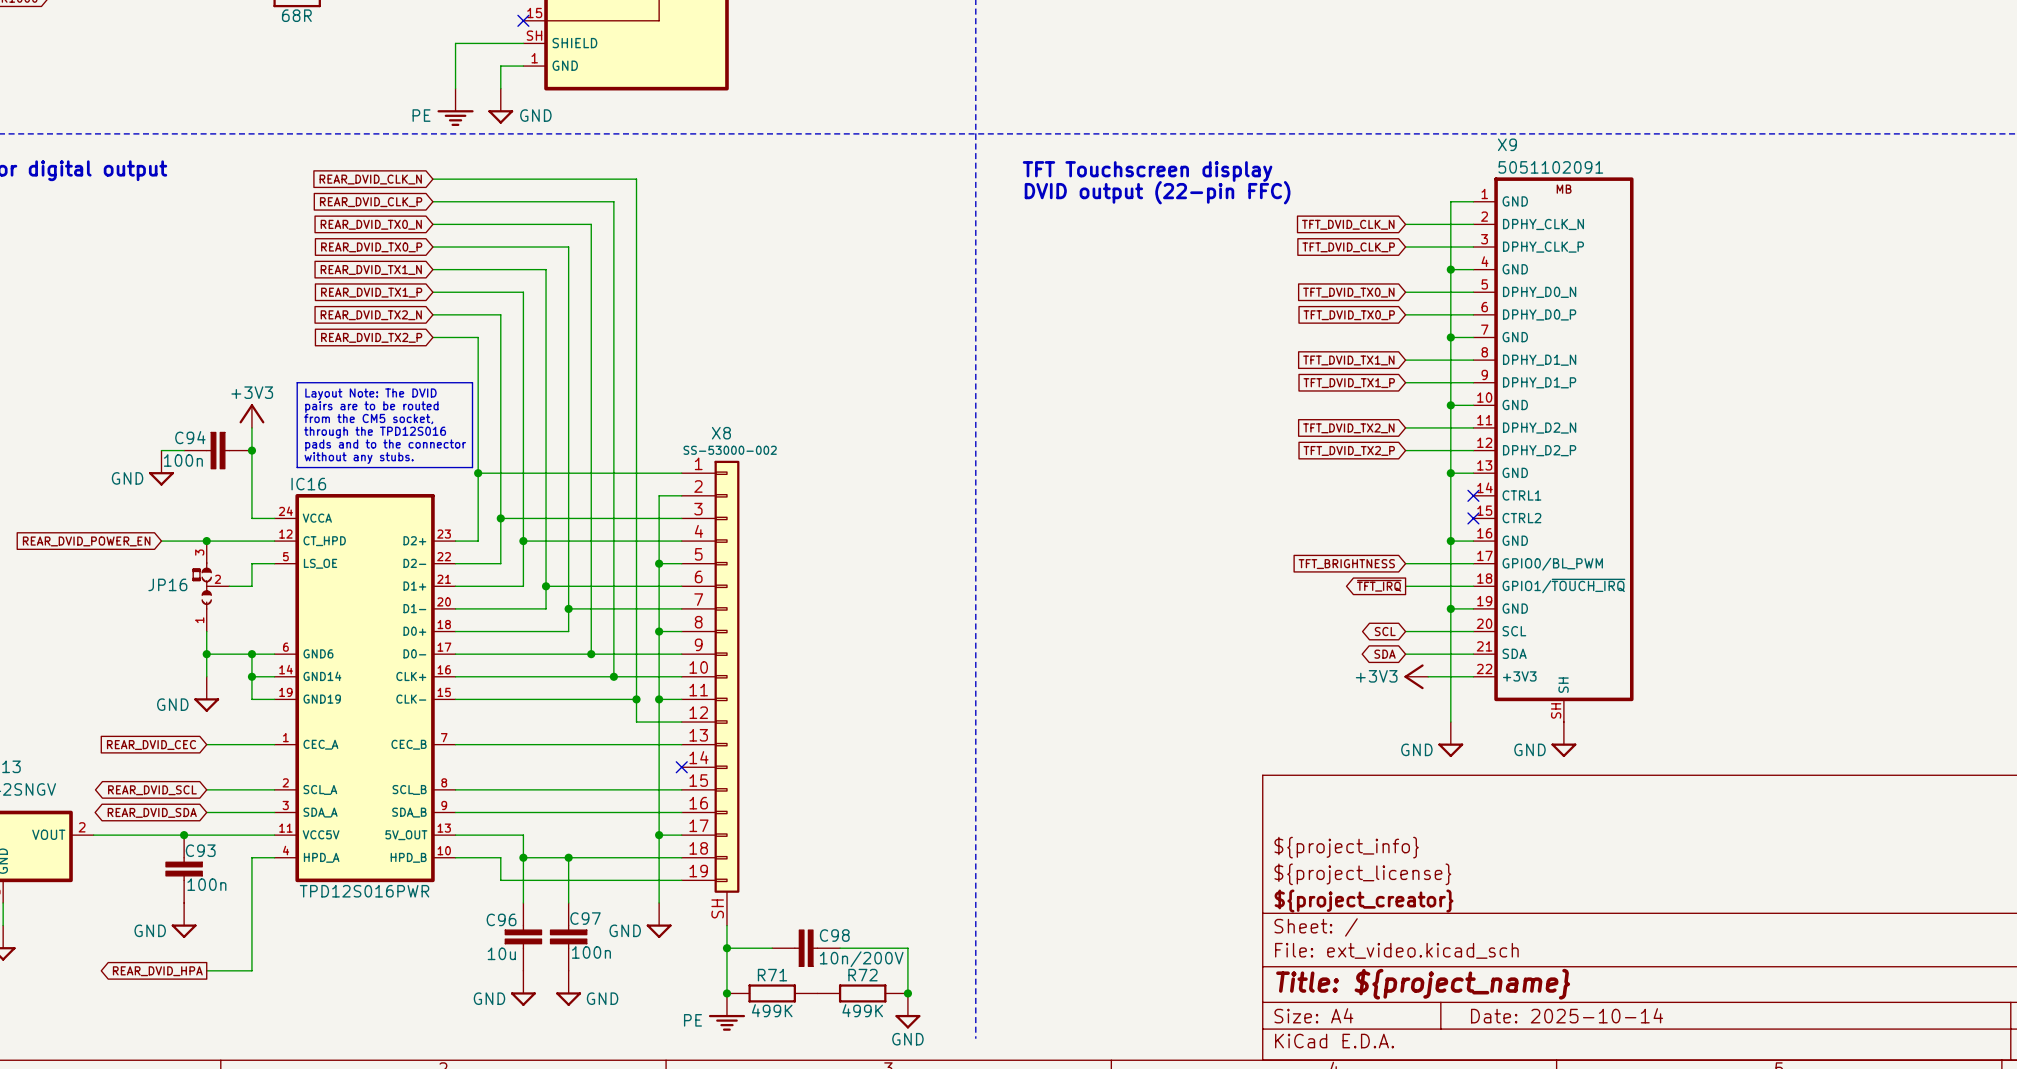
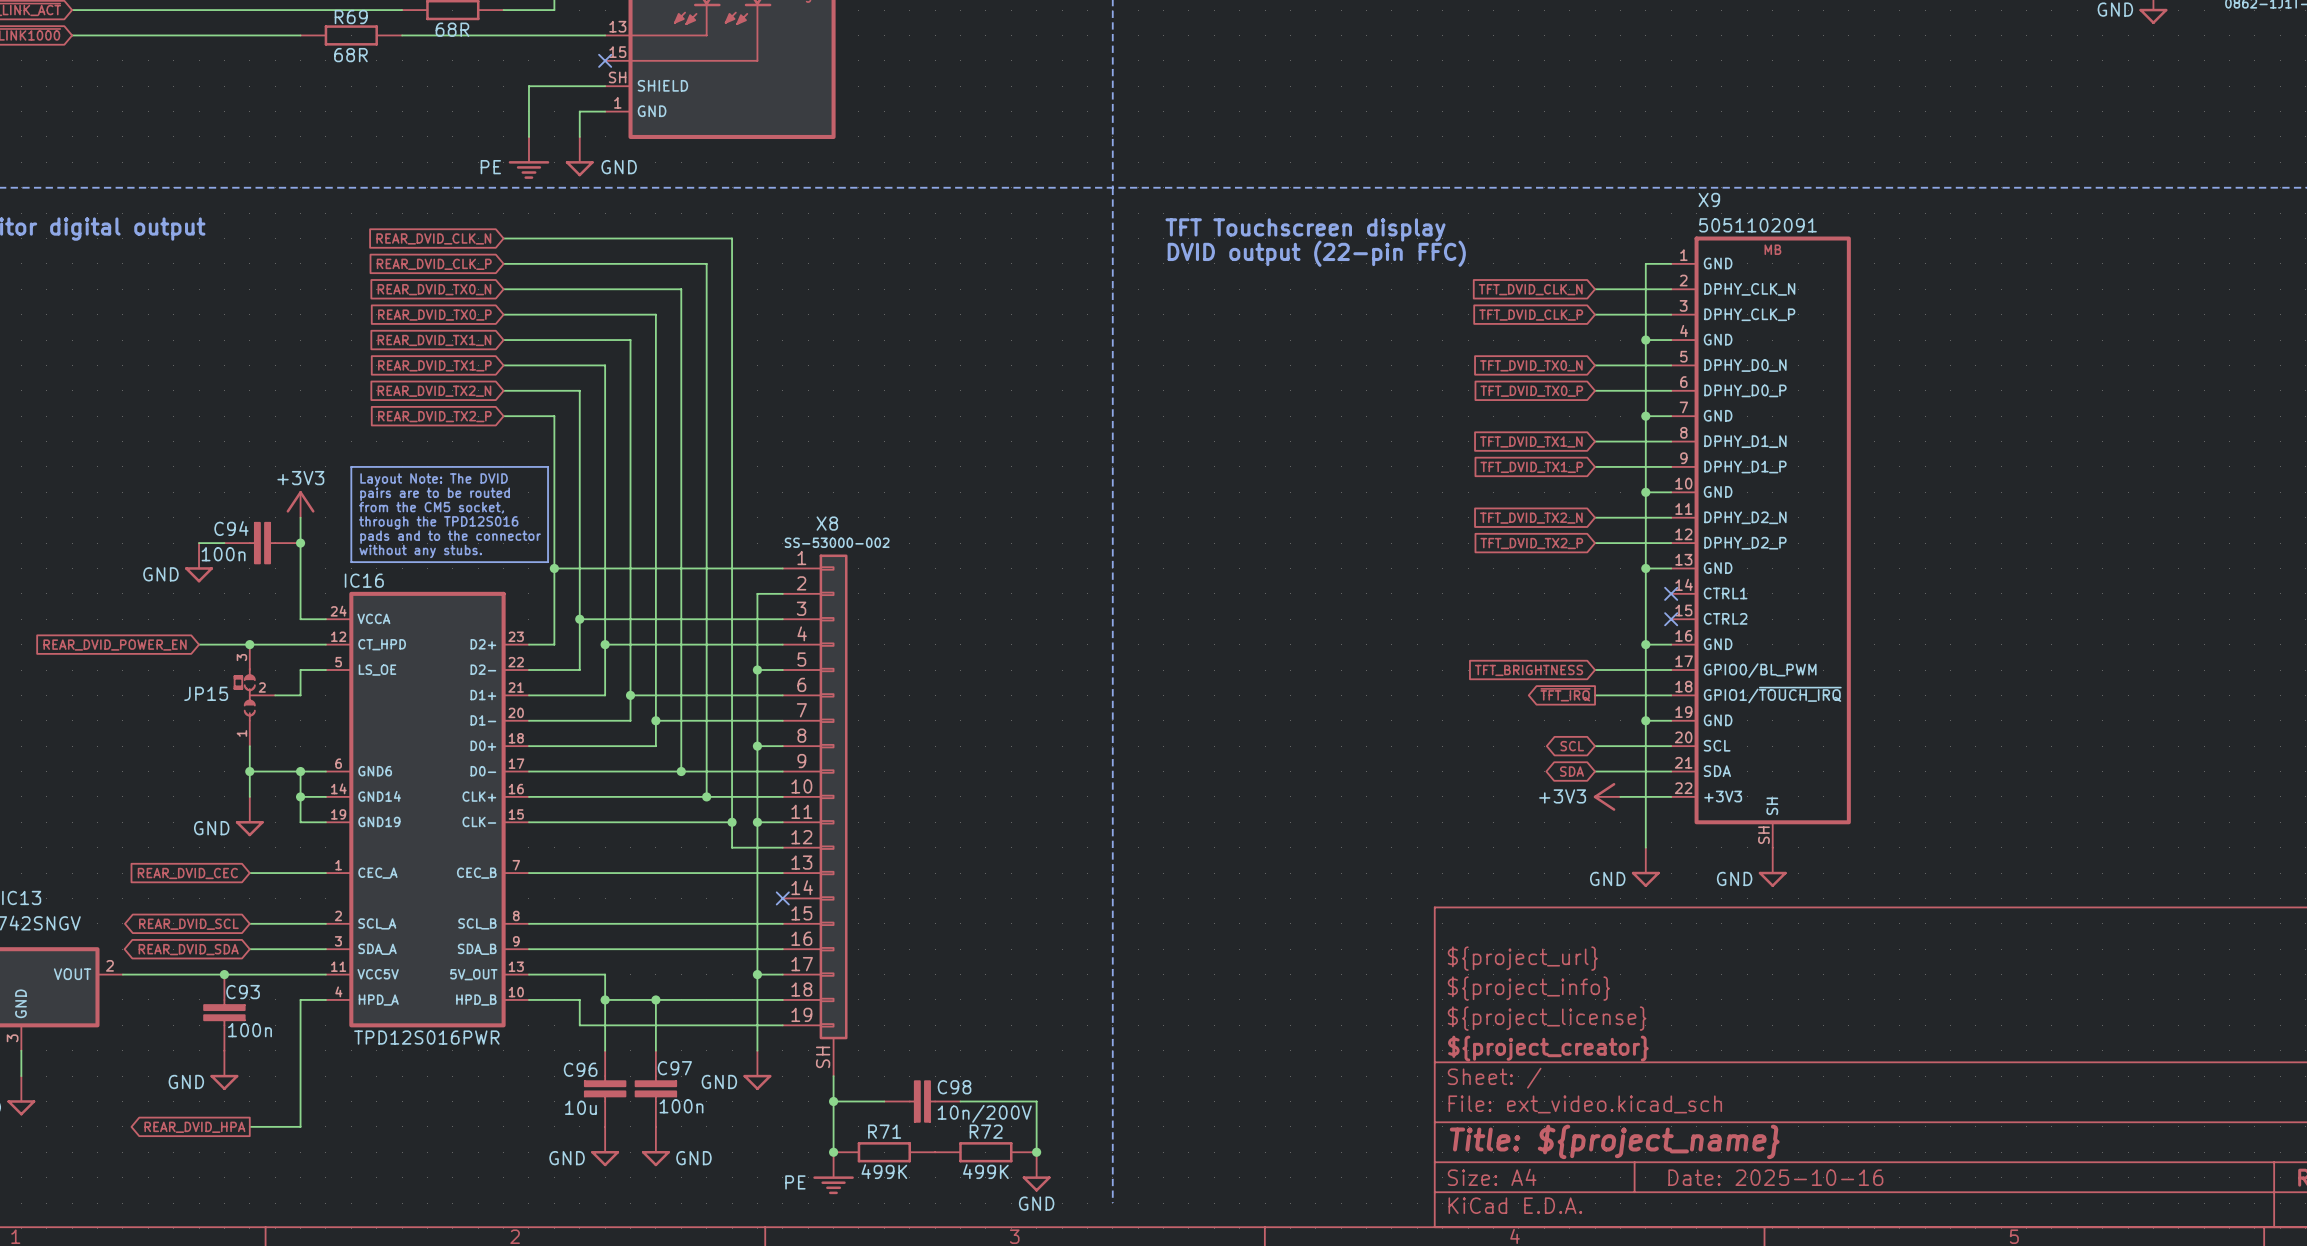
JP16 name: JP16 (167, 584) -> JP15 (206, 693)
title block: none -> ${project_url} (1522, 958)
title block: Date: 2025-10-14 (1567, 1015) -> Date: 2025-10-16 (1775, 1177)

